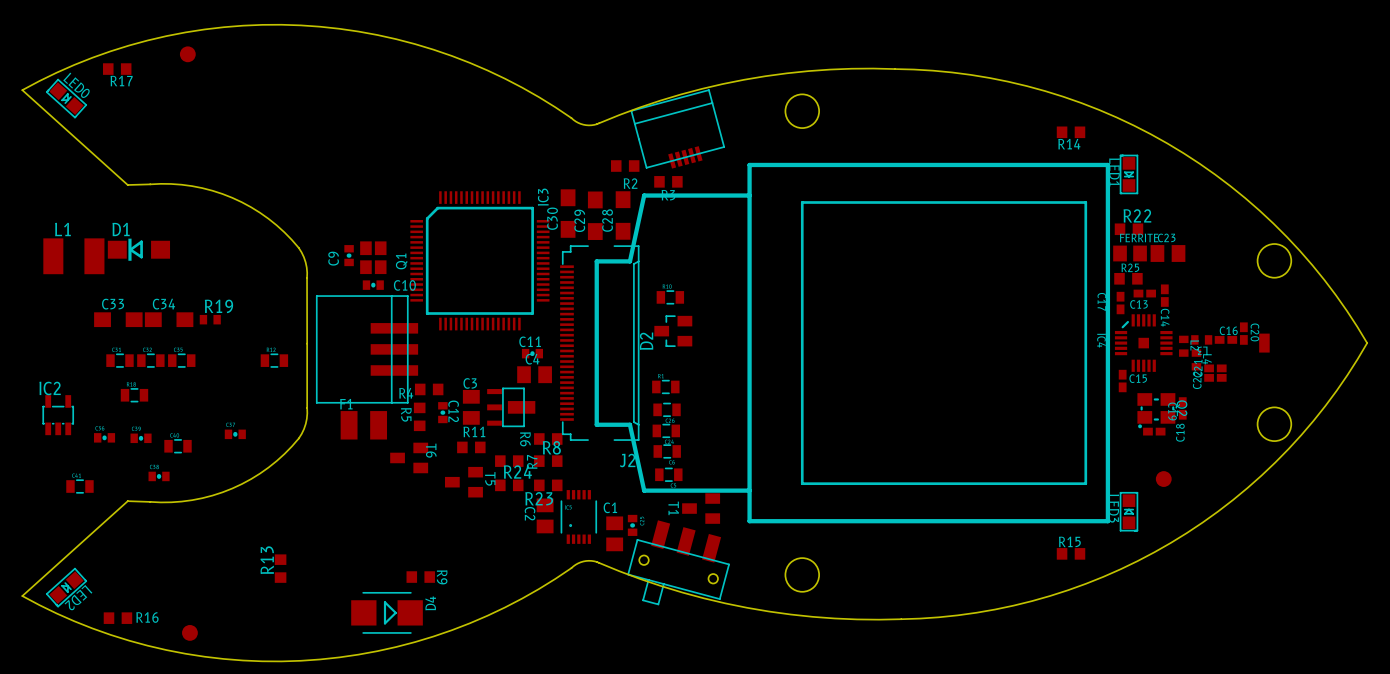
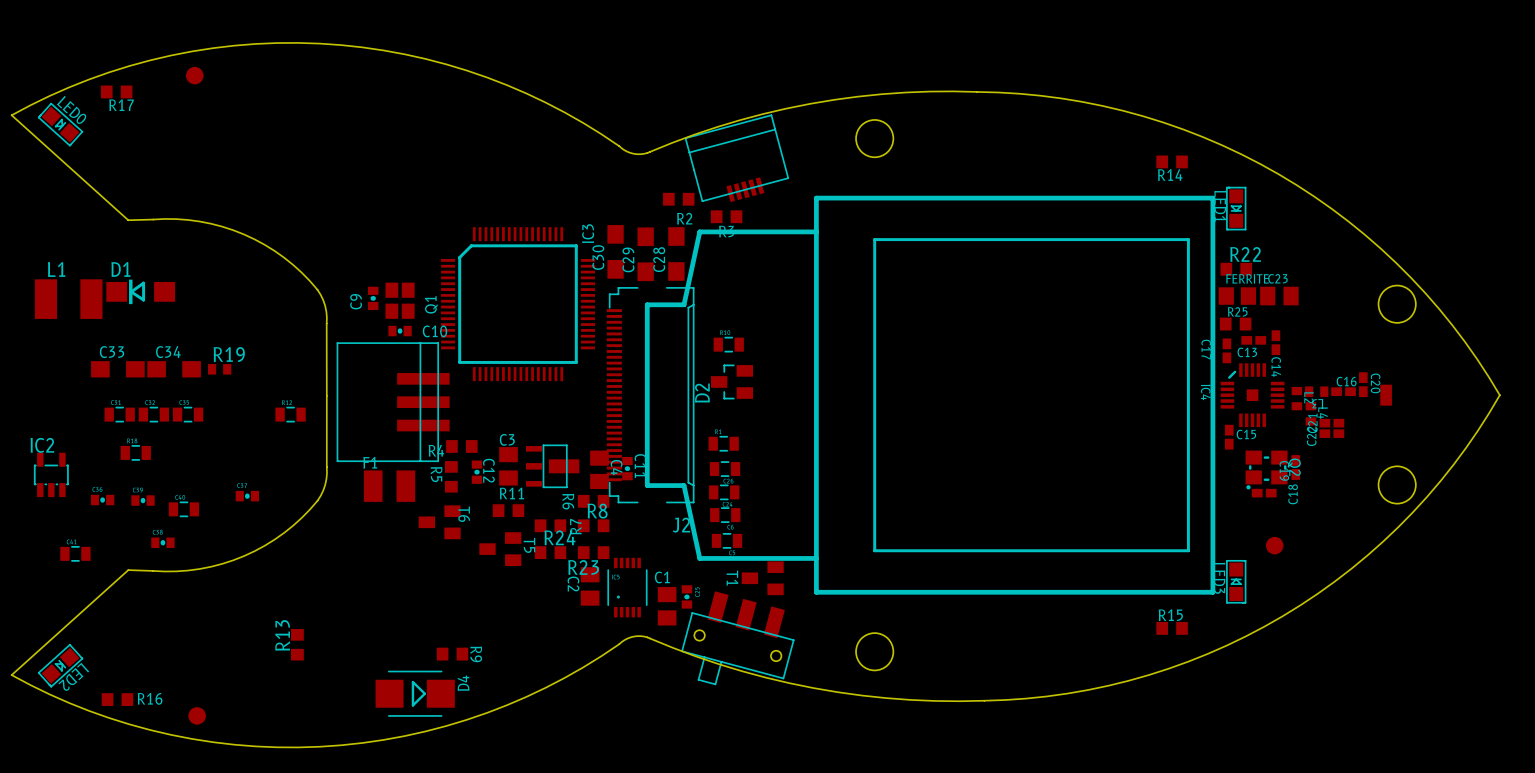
C11 rotation: 0° (532, 353) -> 90° clockwise (627, 468)
C11 position: (532, 353) -> (627, 468)
C4 rotation: 0° (534, 374) -> 90° clockwise (599, 469)
C4 position: (534, 374) -> (599, 469)

